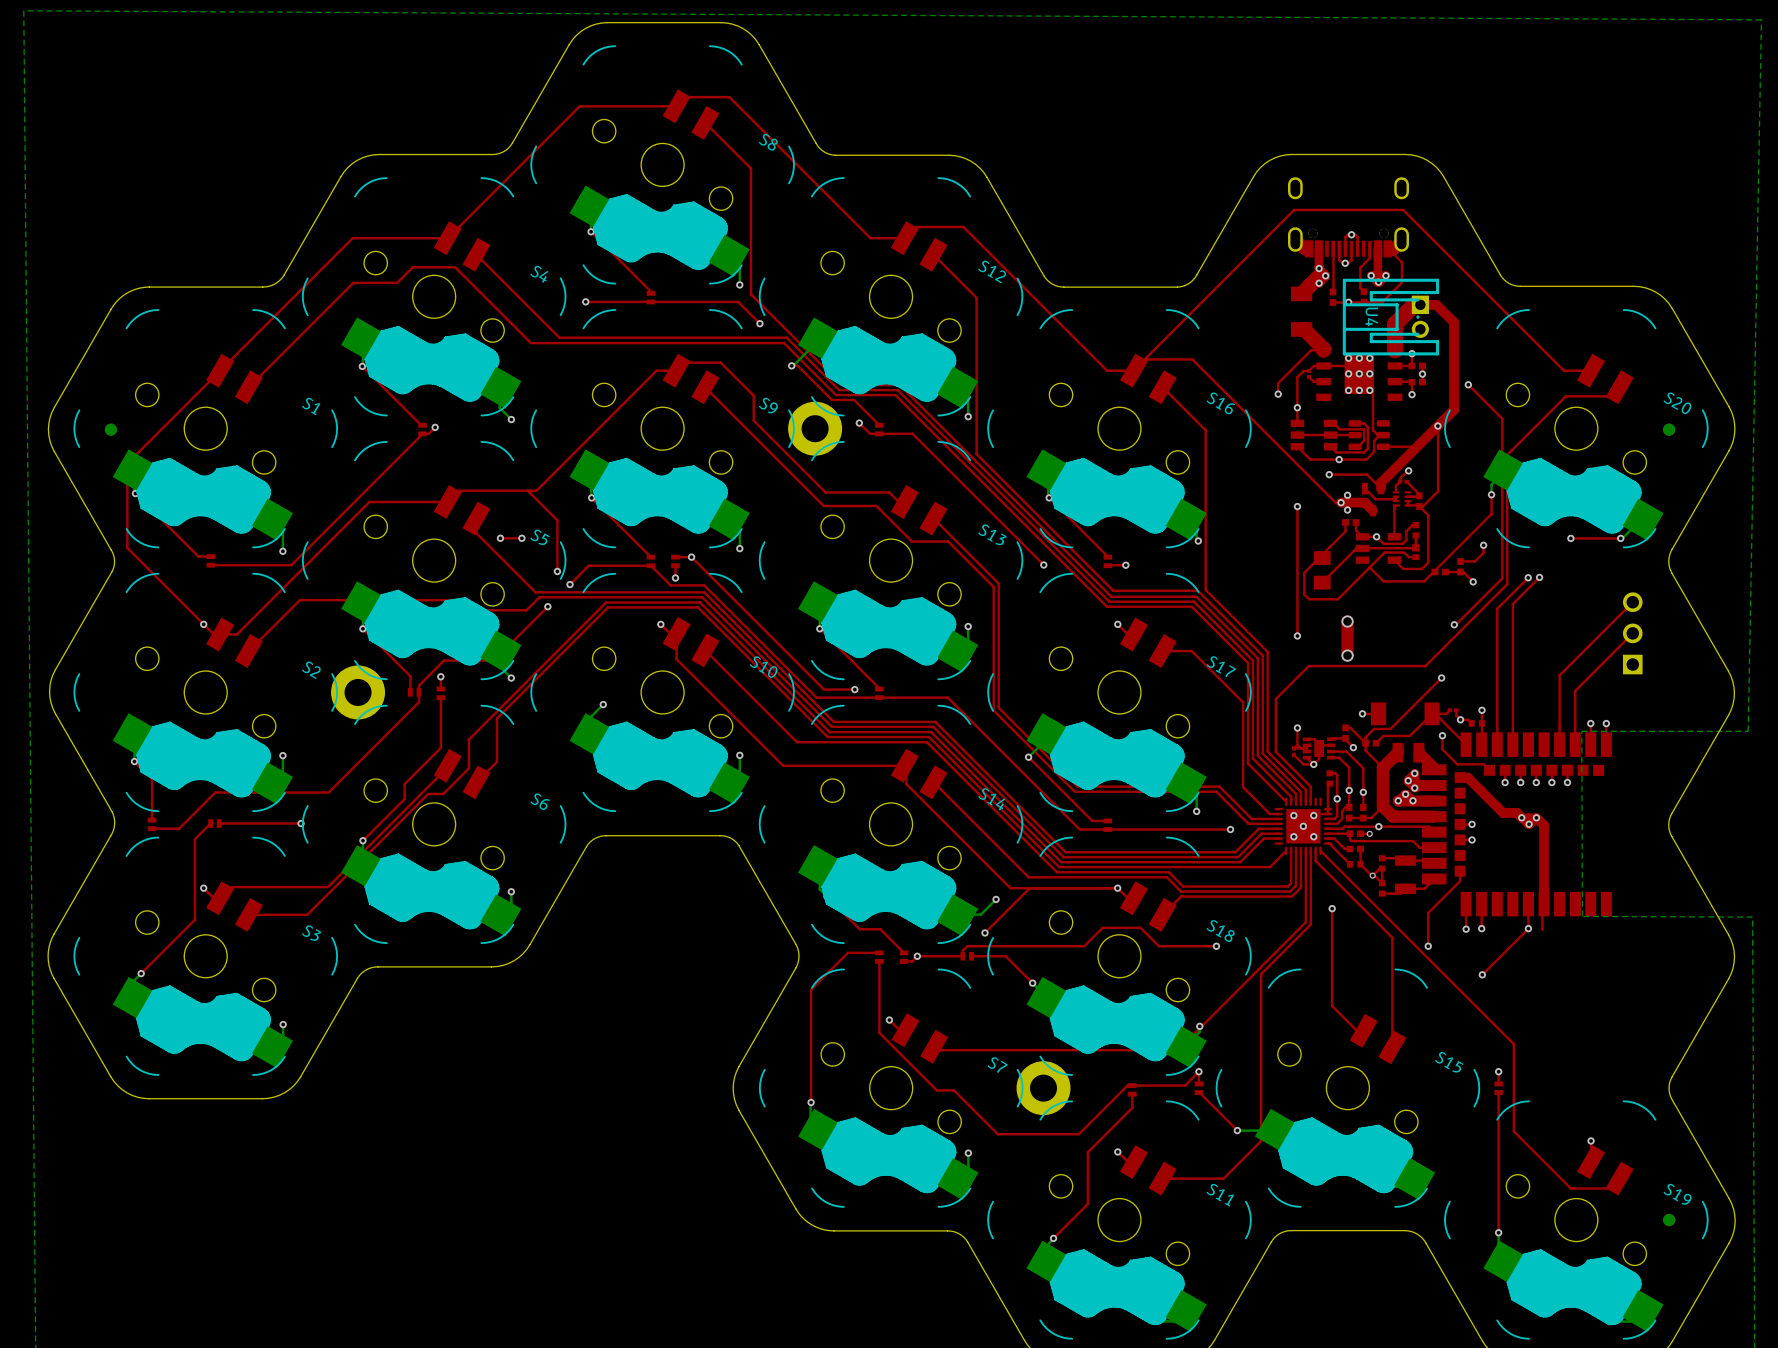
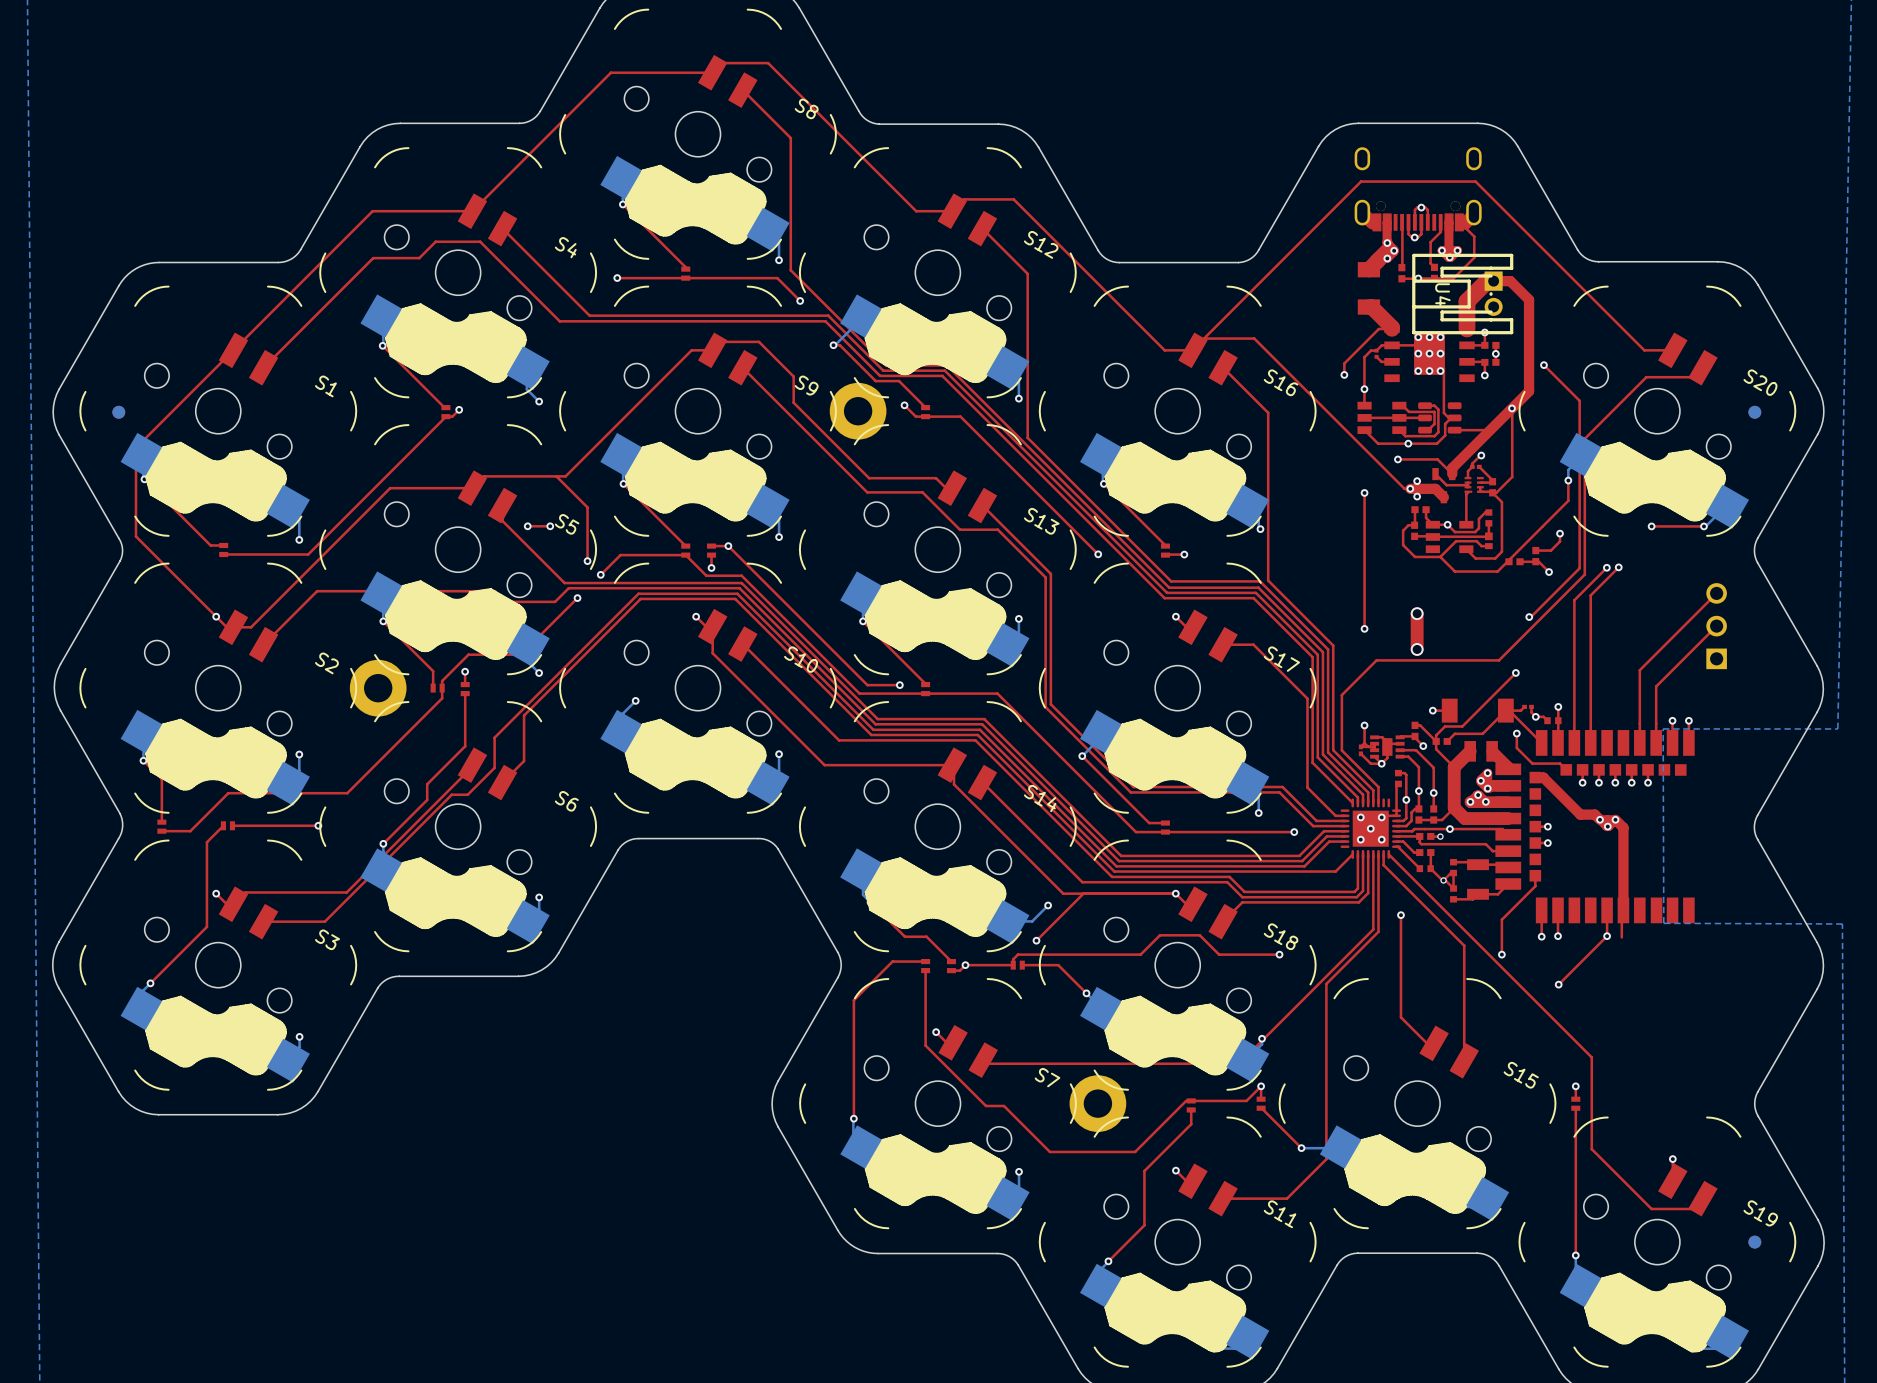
top track: (1345, 531) (1323, 553) (1328, 557) (1319, 557) (1304, 572) (1304, 594) (1309, 599) (1337, 599) (1369, 567) -> (1414, 519) (1414, 525) (1408, 525) (1403, 530) (1403, 545) (1415, 556) (1440, 556)
part: none -> (1414, 530)
top track: none -> (1432, 536) (1414, 536)
top track: (1362, 548) (1356, 548) (1328, 576) (1328, 581) -> none
part: (1322, 570) -> none

